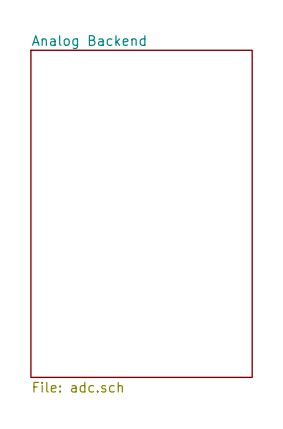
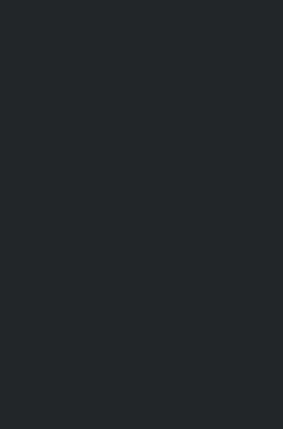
sheet Analog Backend: File: adc.sch (141, 213) -> none

